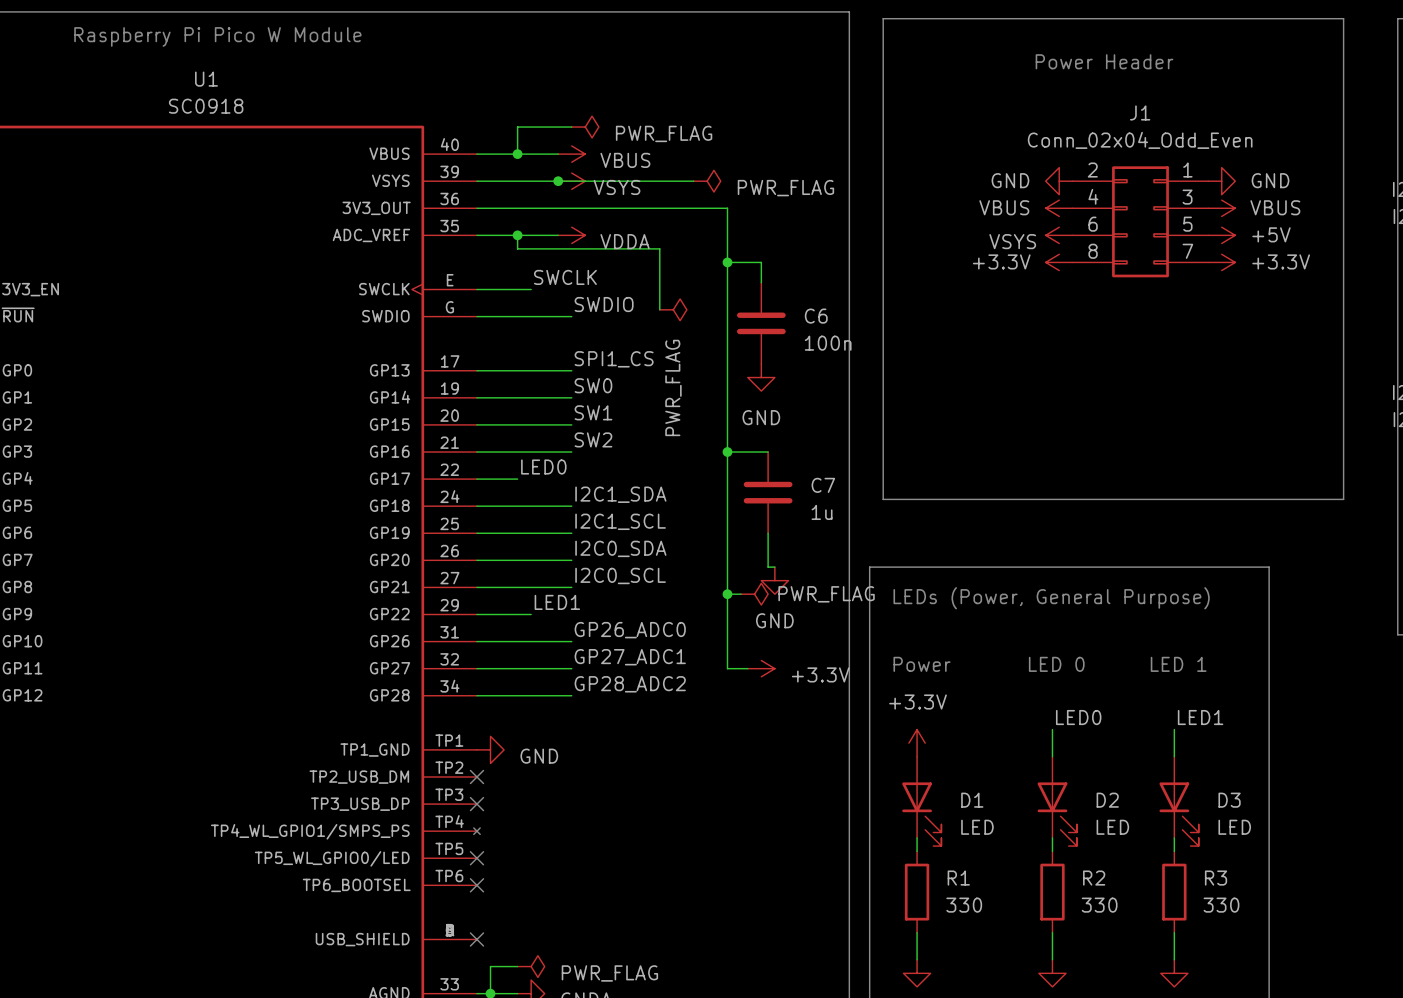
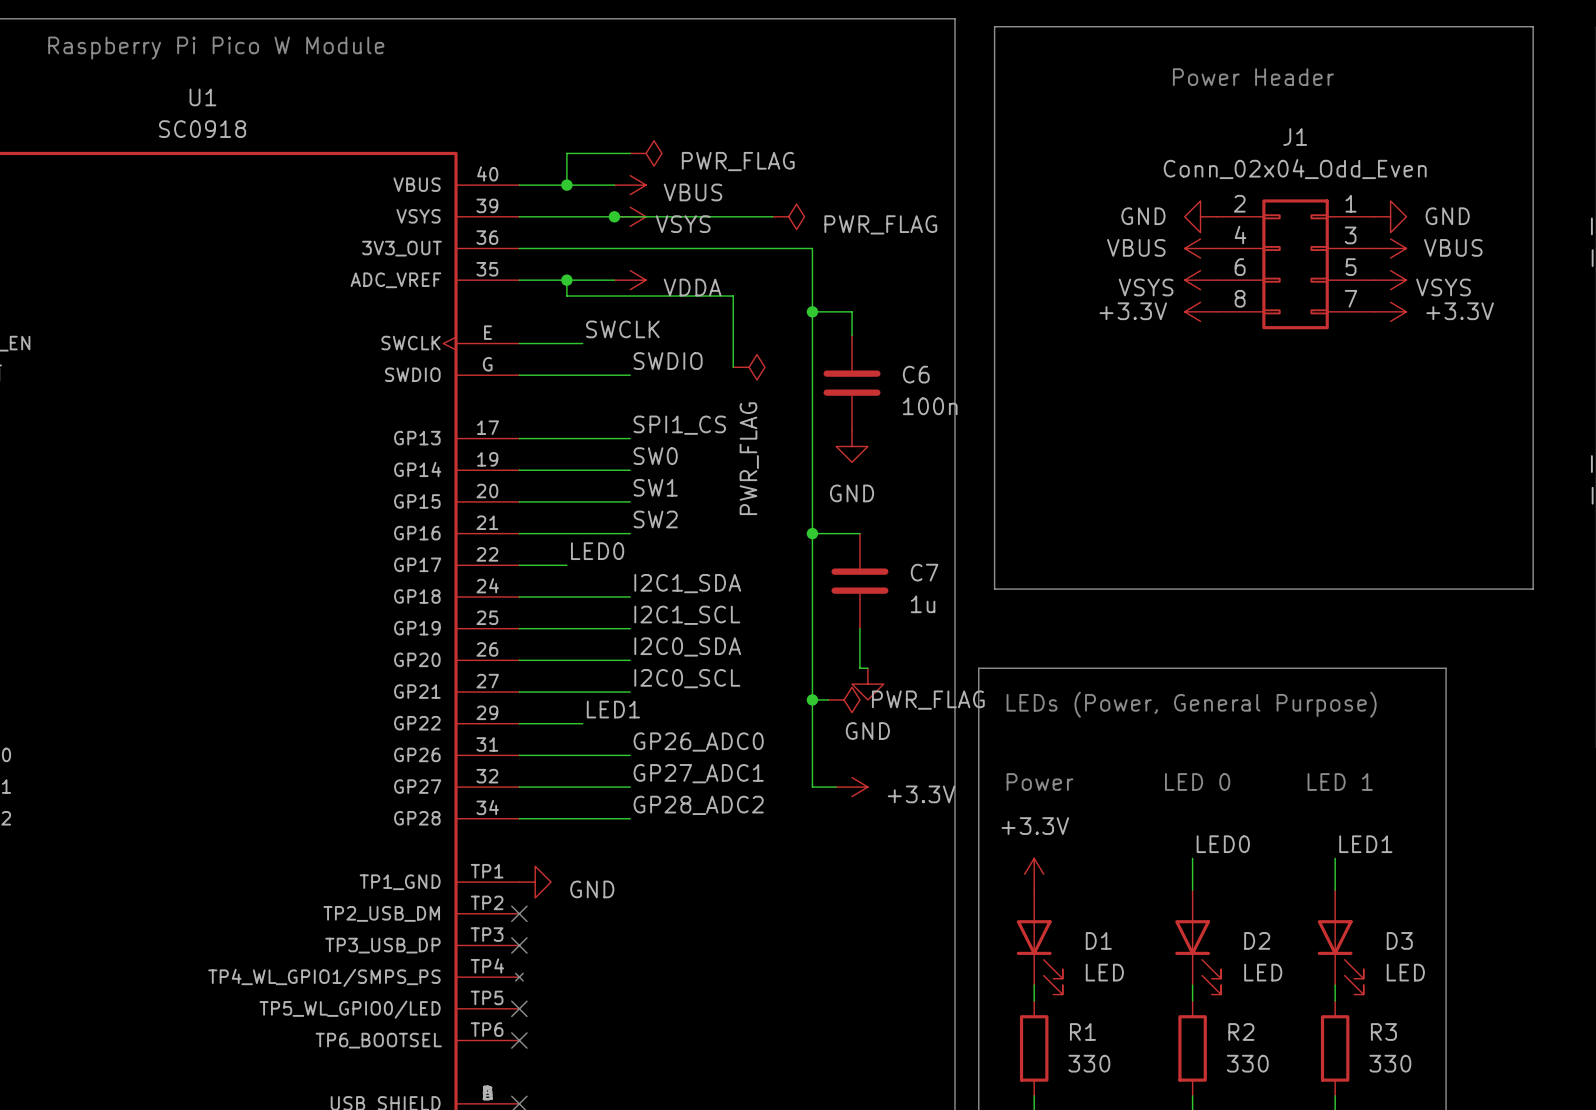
power symbol: +5V (1221, 235) -> VSYS (1390, 280)

